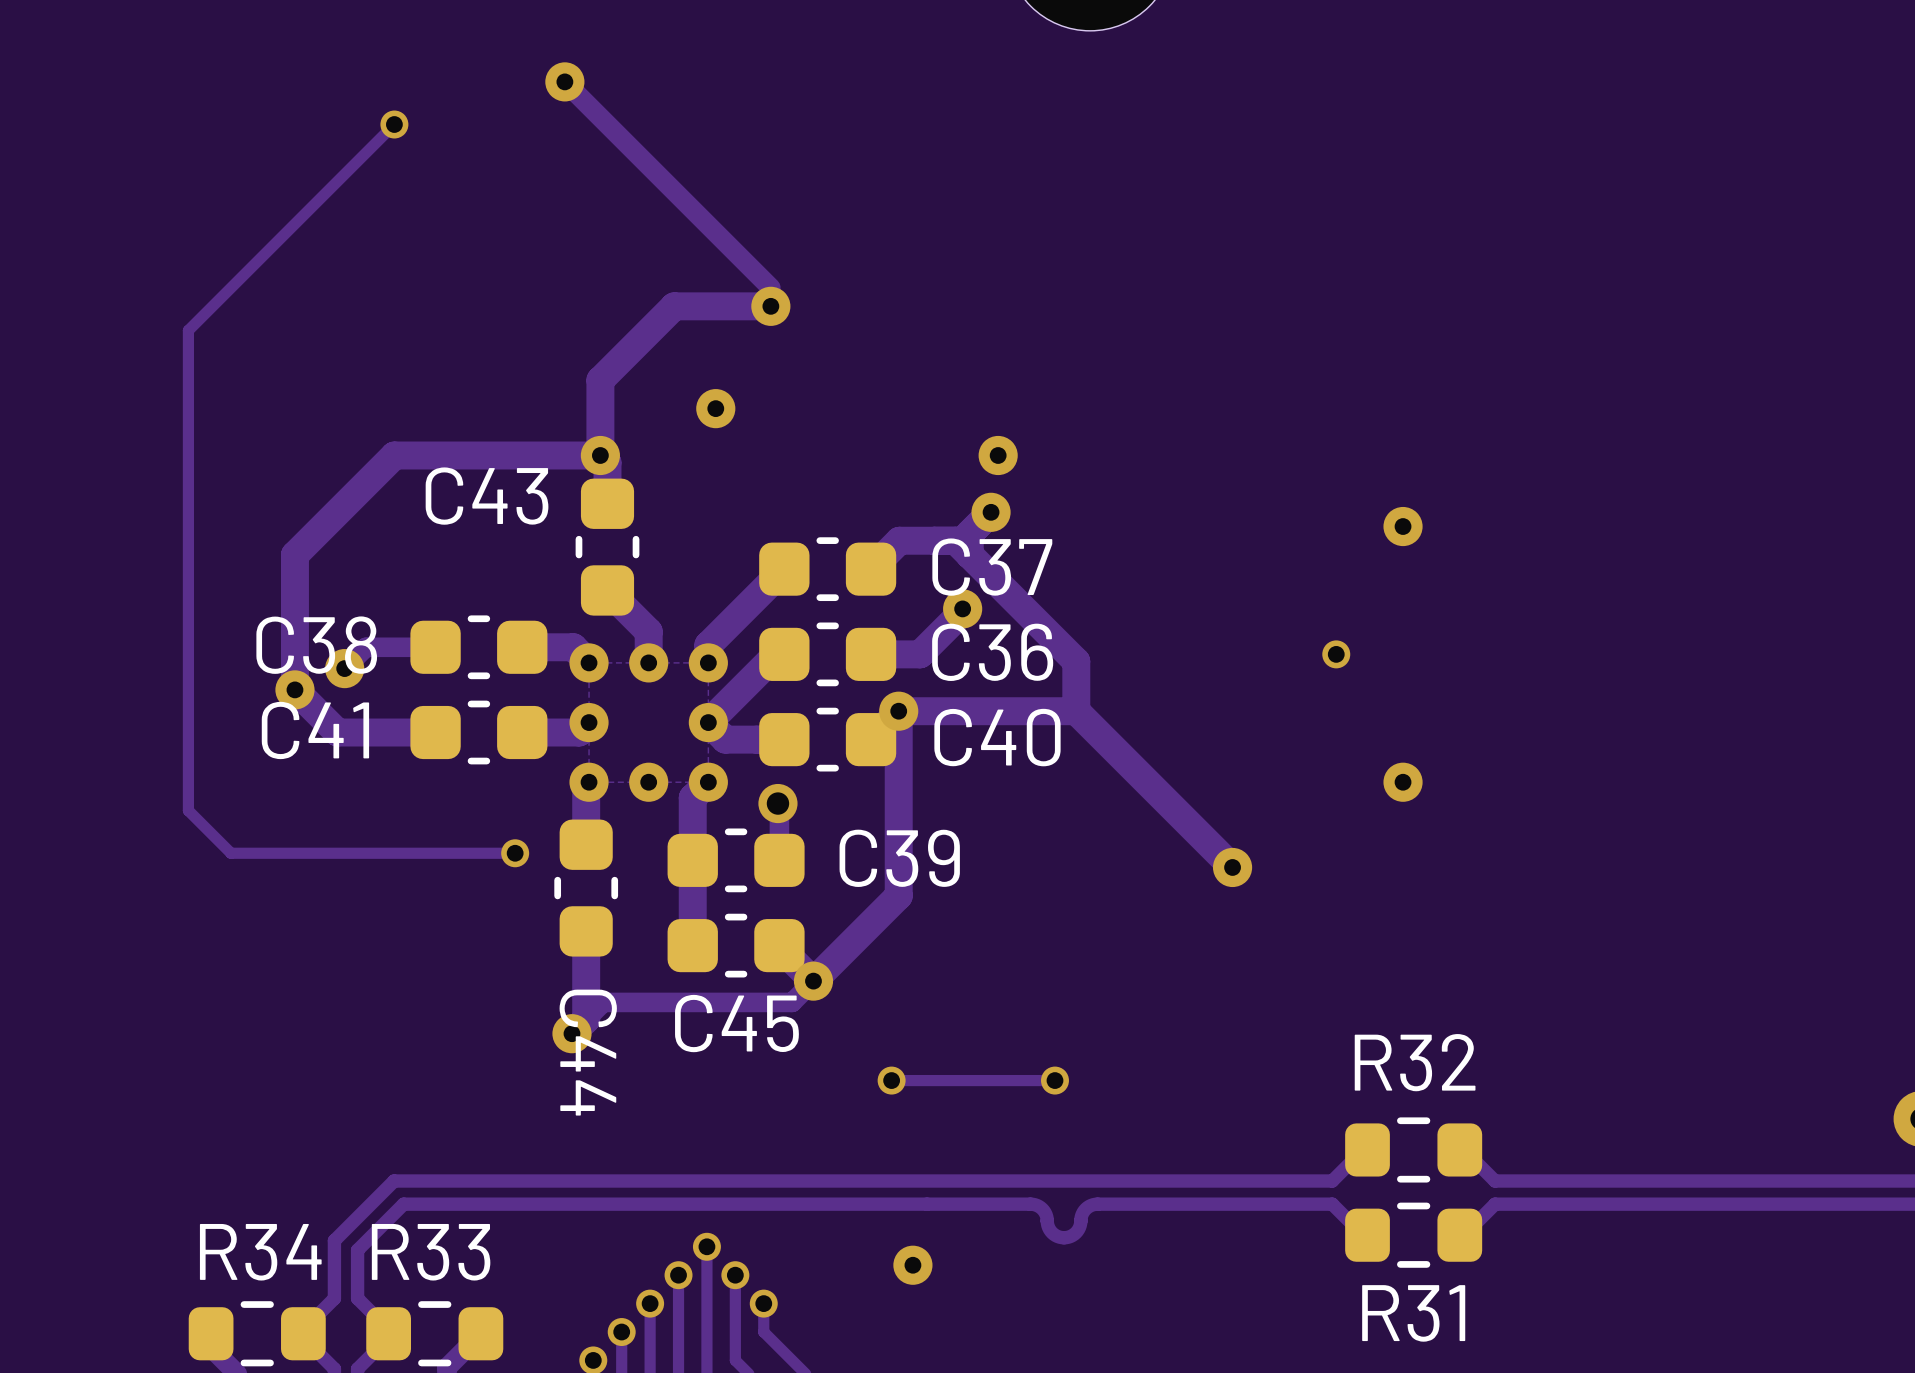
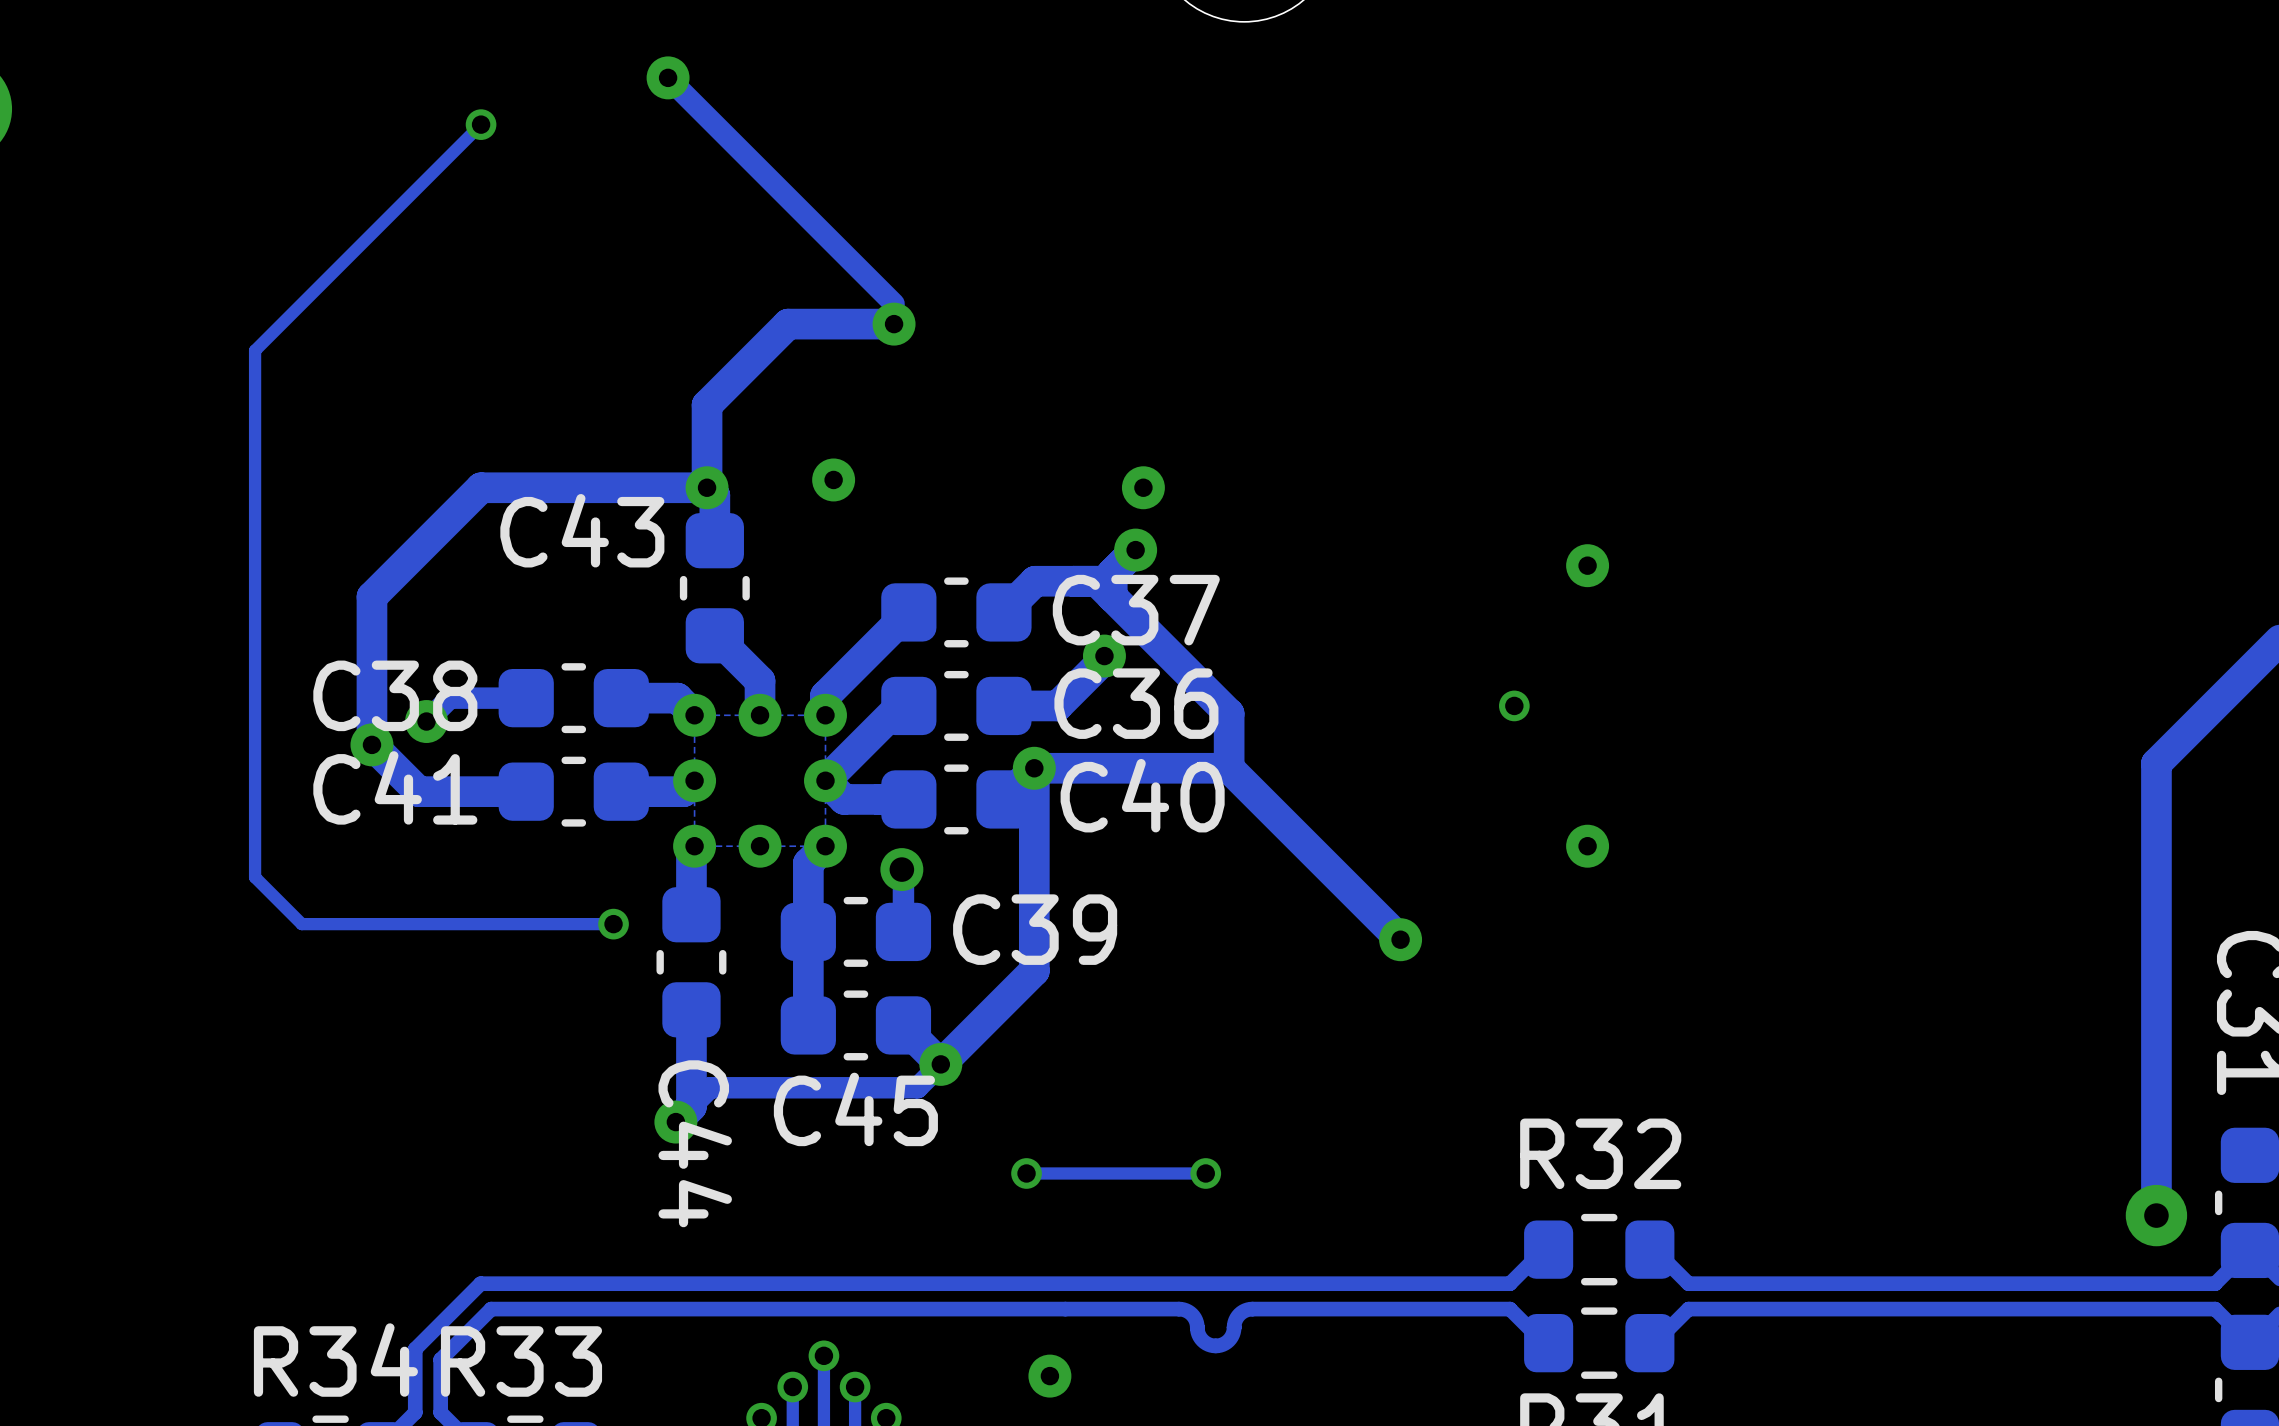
via position: (715, 408) -> (833, 479)

